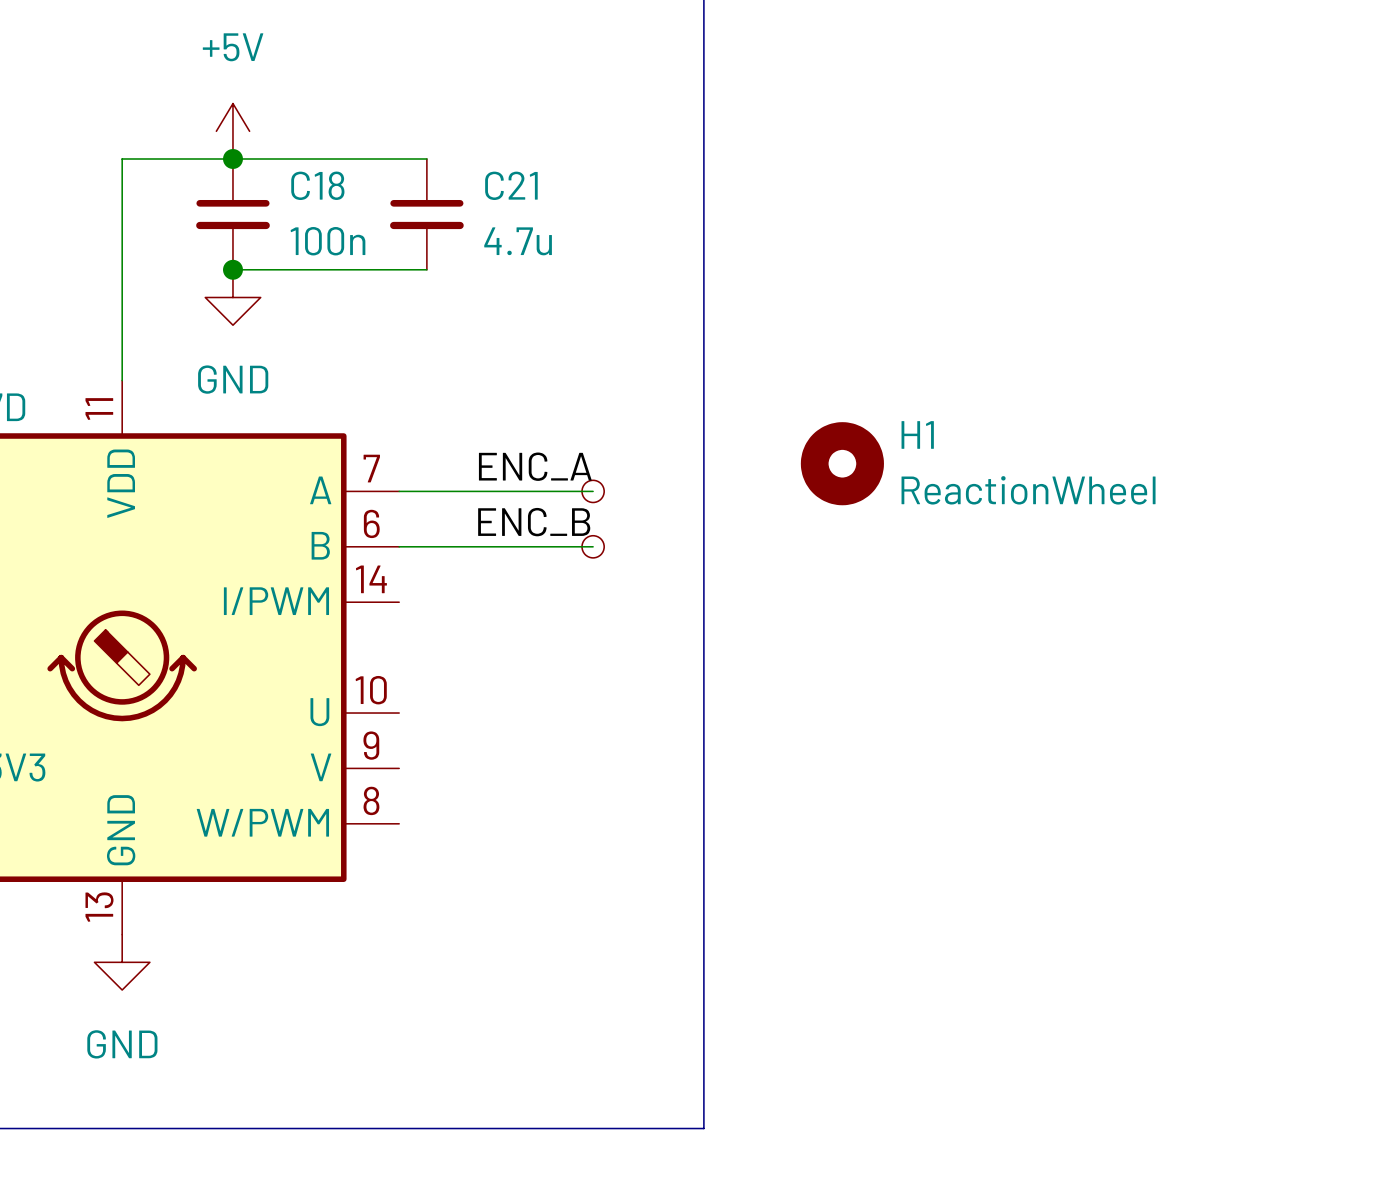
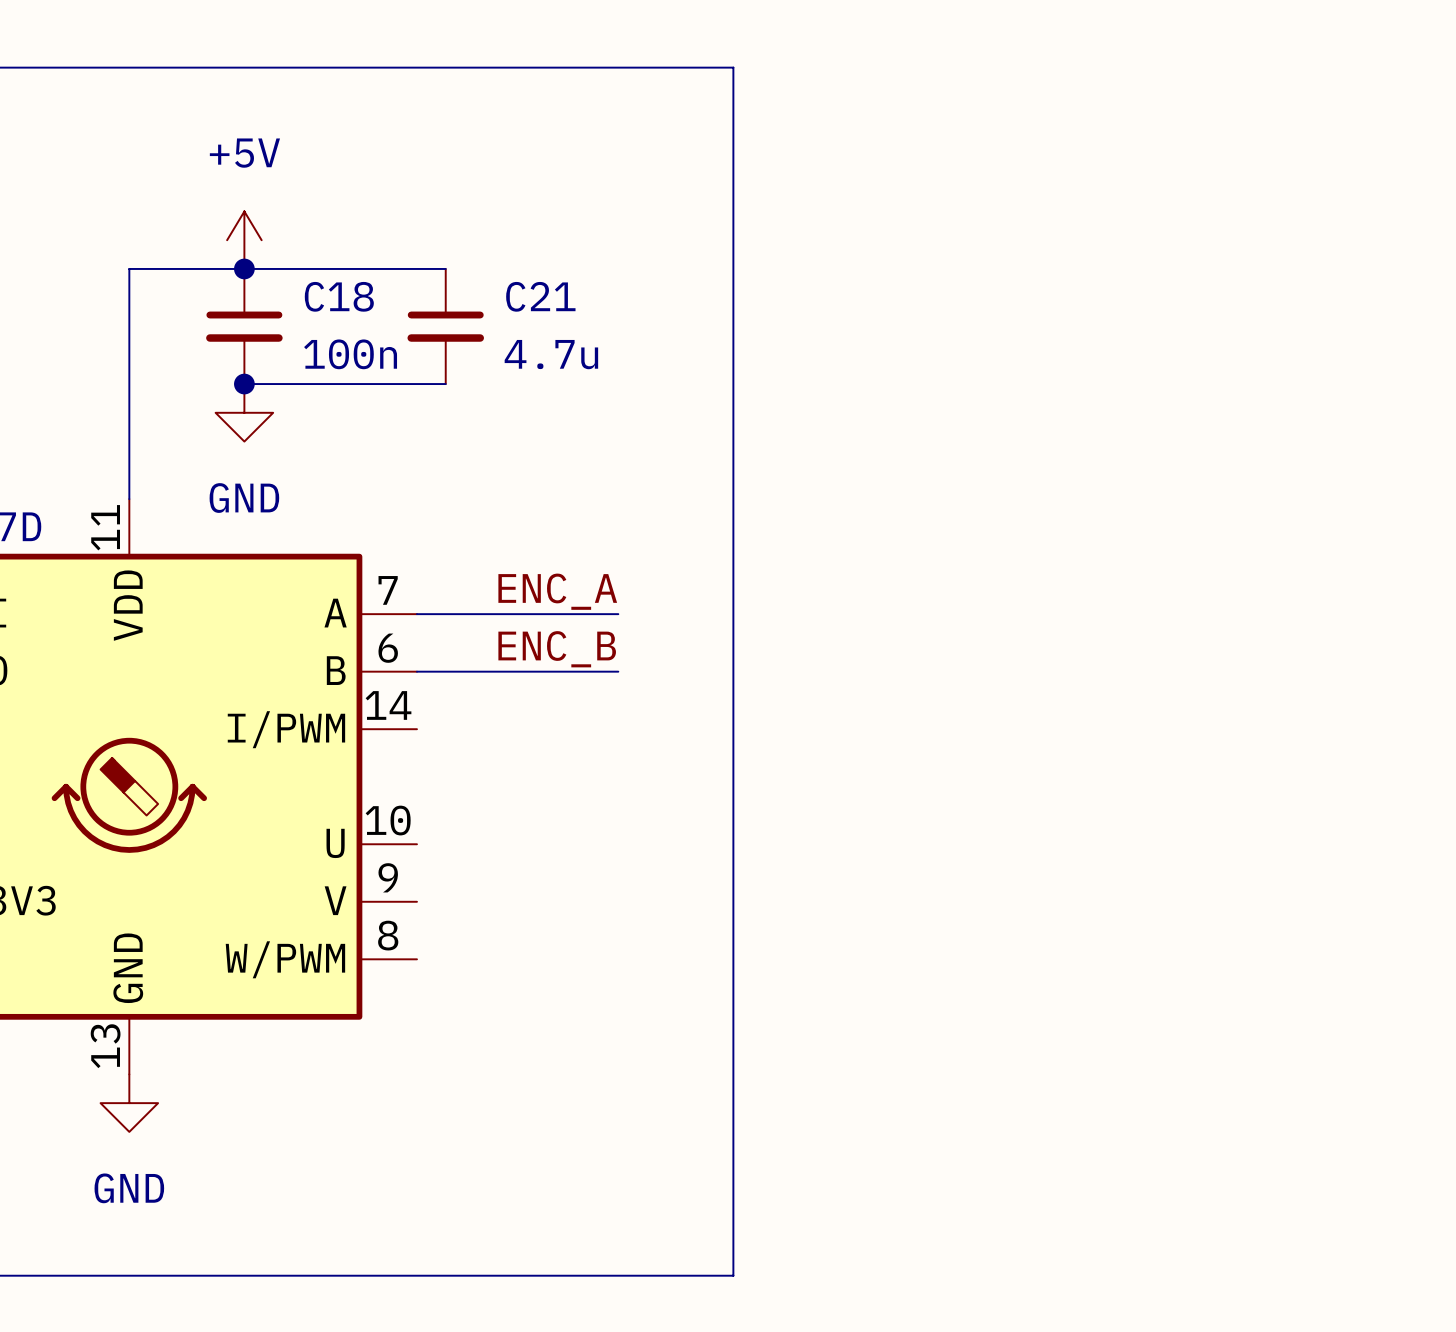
H1: ReactionWheel (842, 463) -> none
part: (593, 491) -> none
part: (593, 546) -> none

